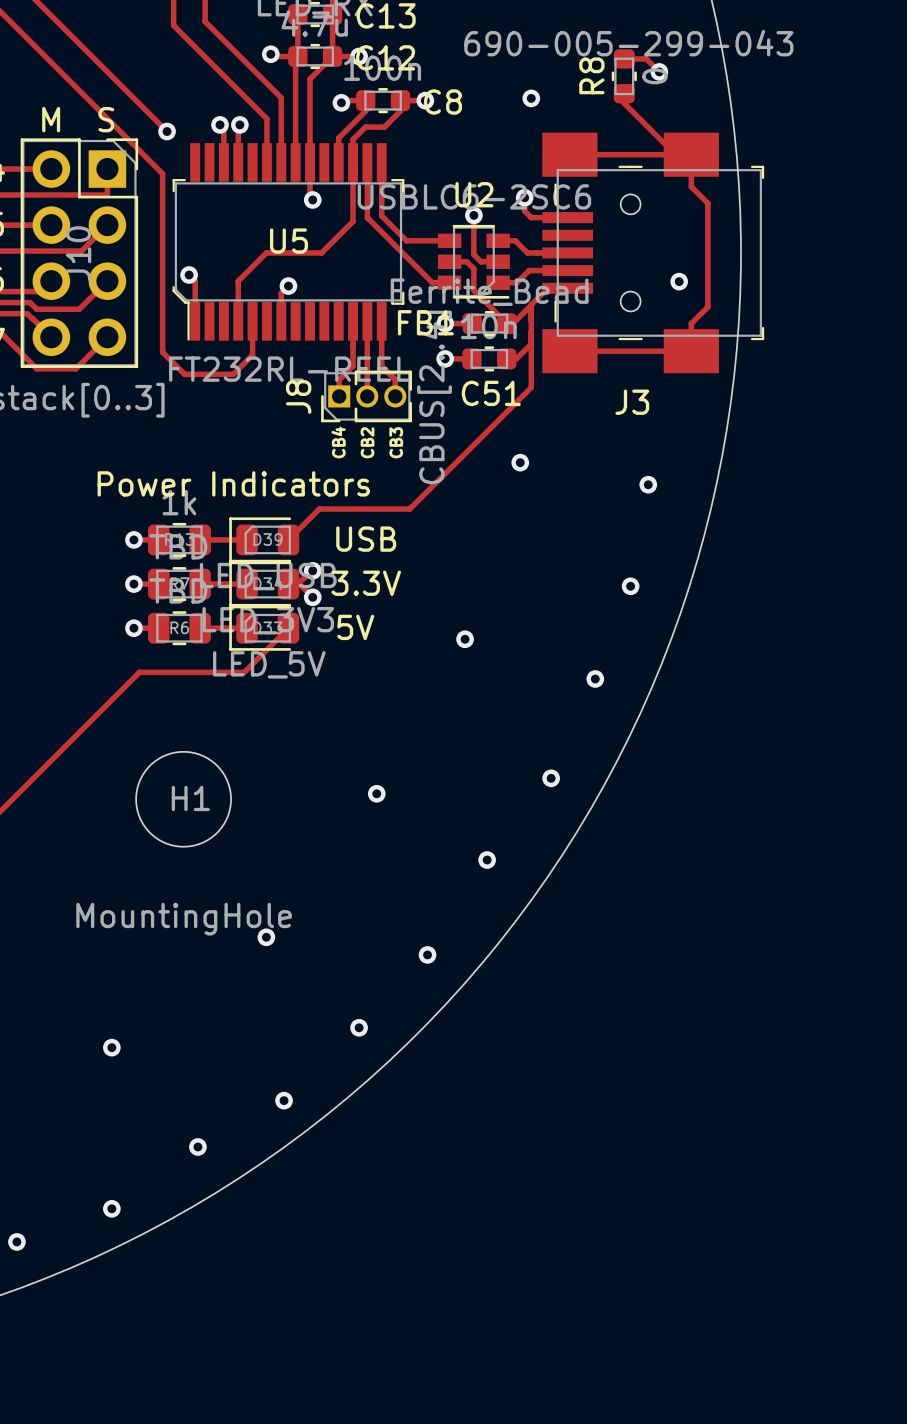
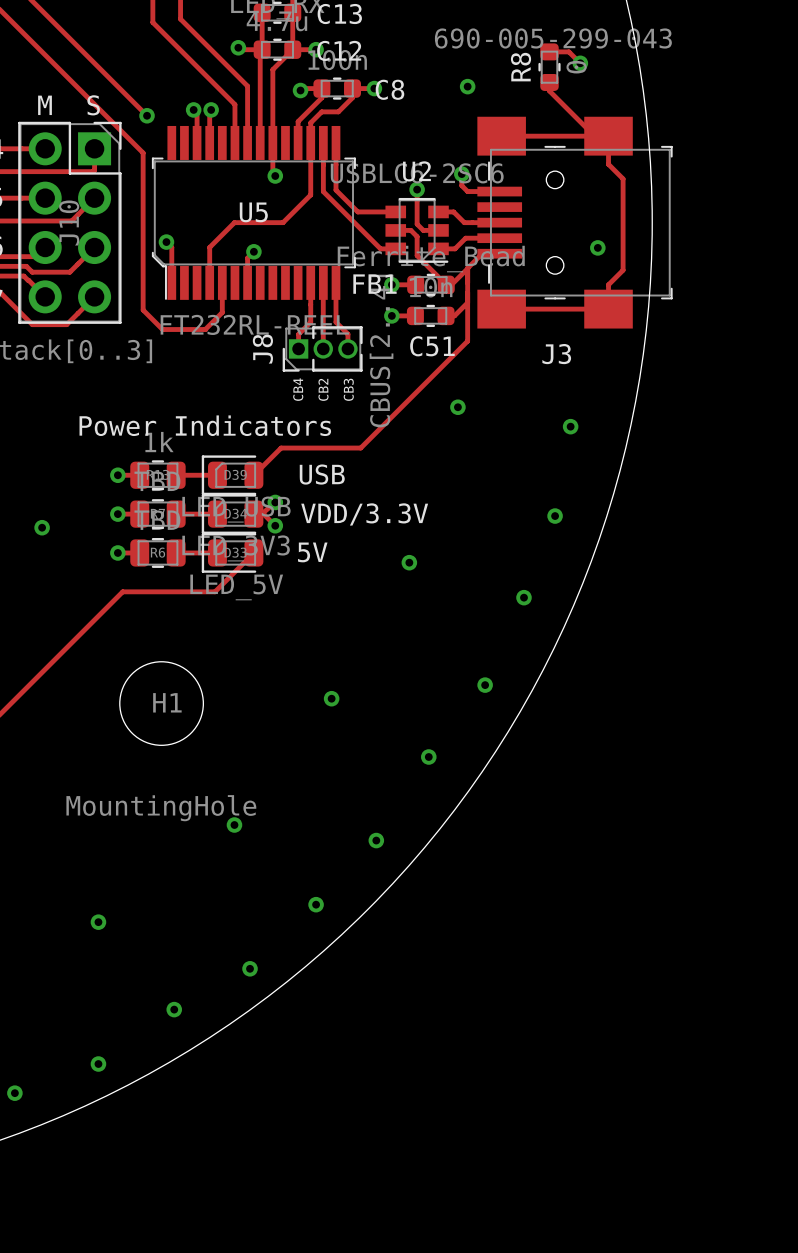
text: 3.3V (366, 583) -> VDD/3.3V (364, 514)
via: none -> (42, 527)

